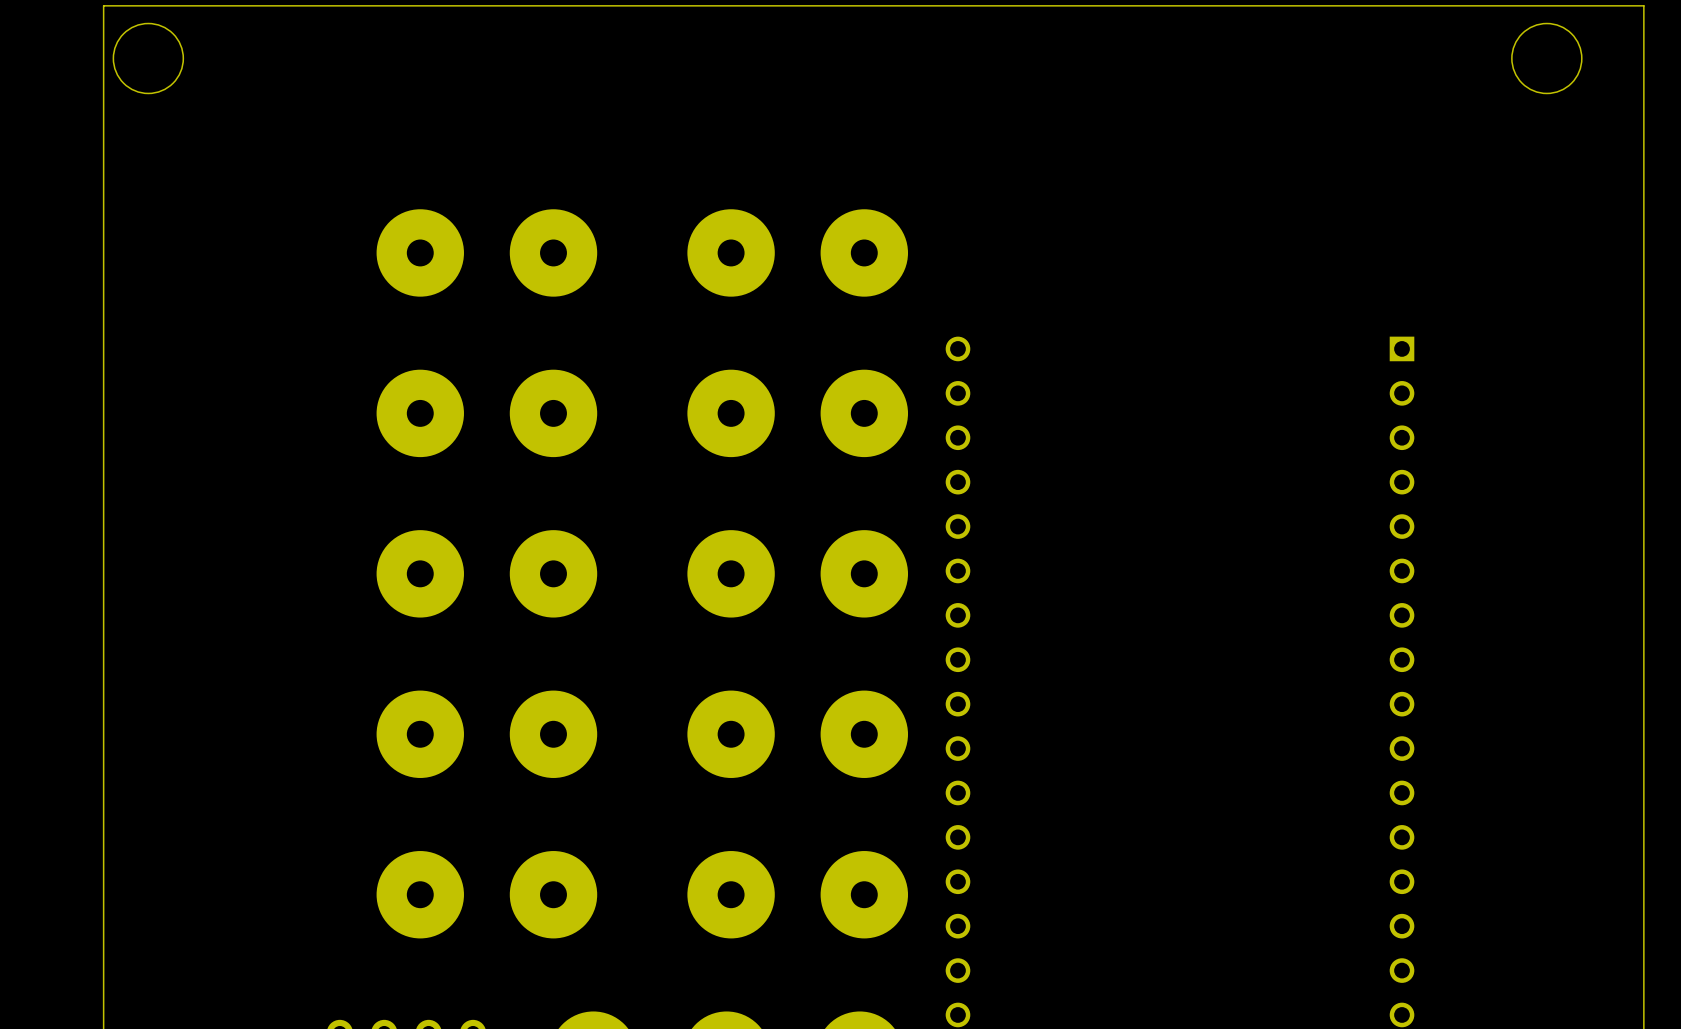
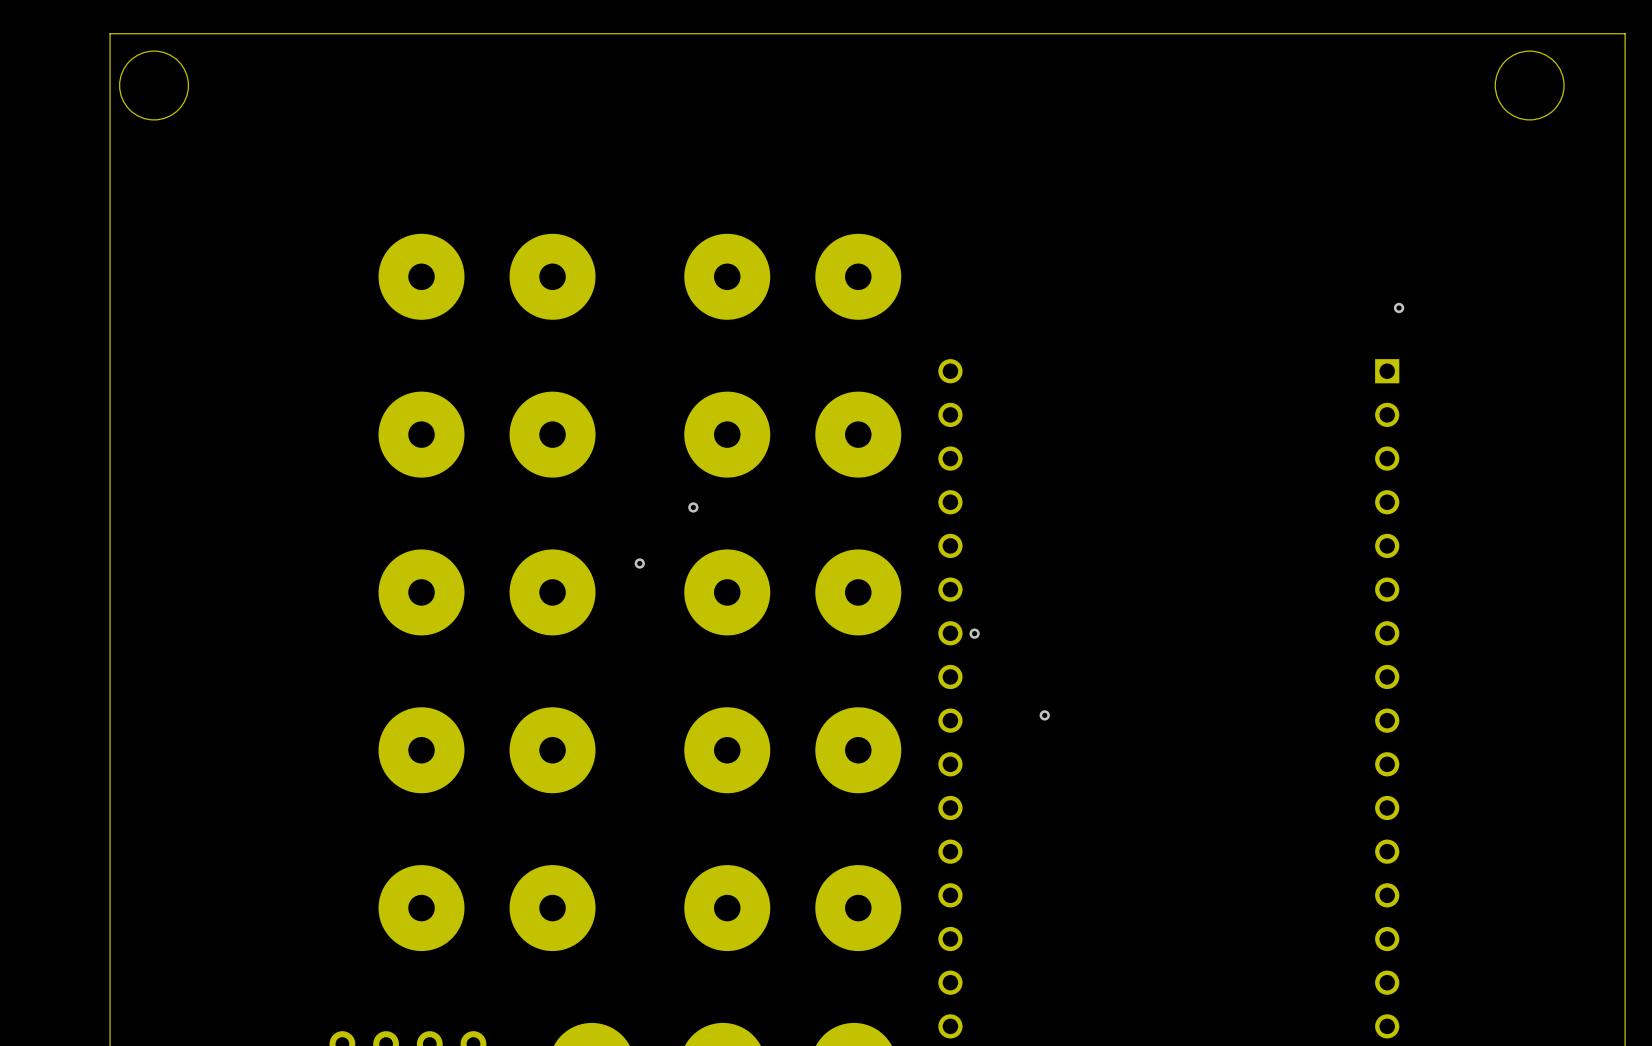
via: none -> (1399, 307)
via: none -> (693, 507)
via: none -> (639, 563)
via: none -> (974, 633)
via: none -> (1044, 715)

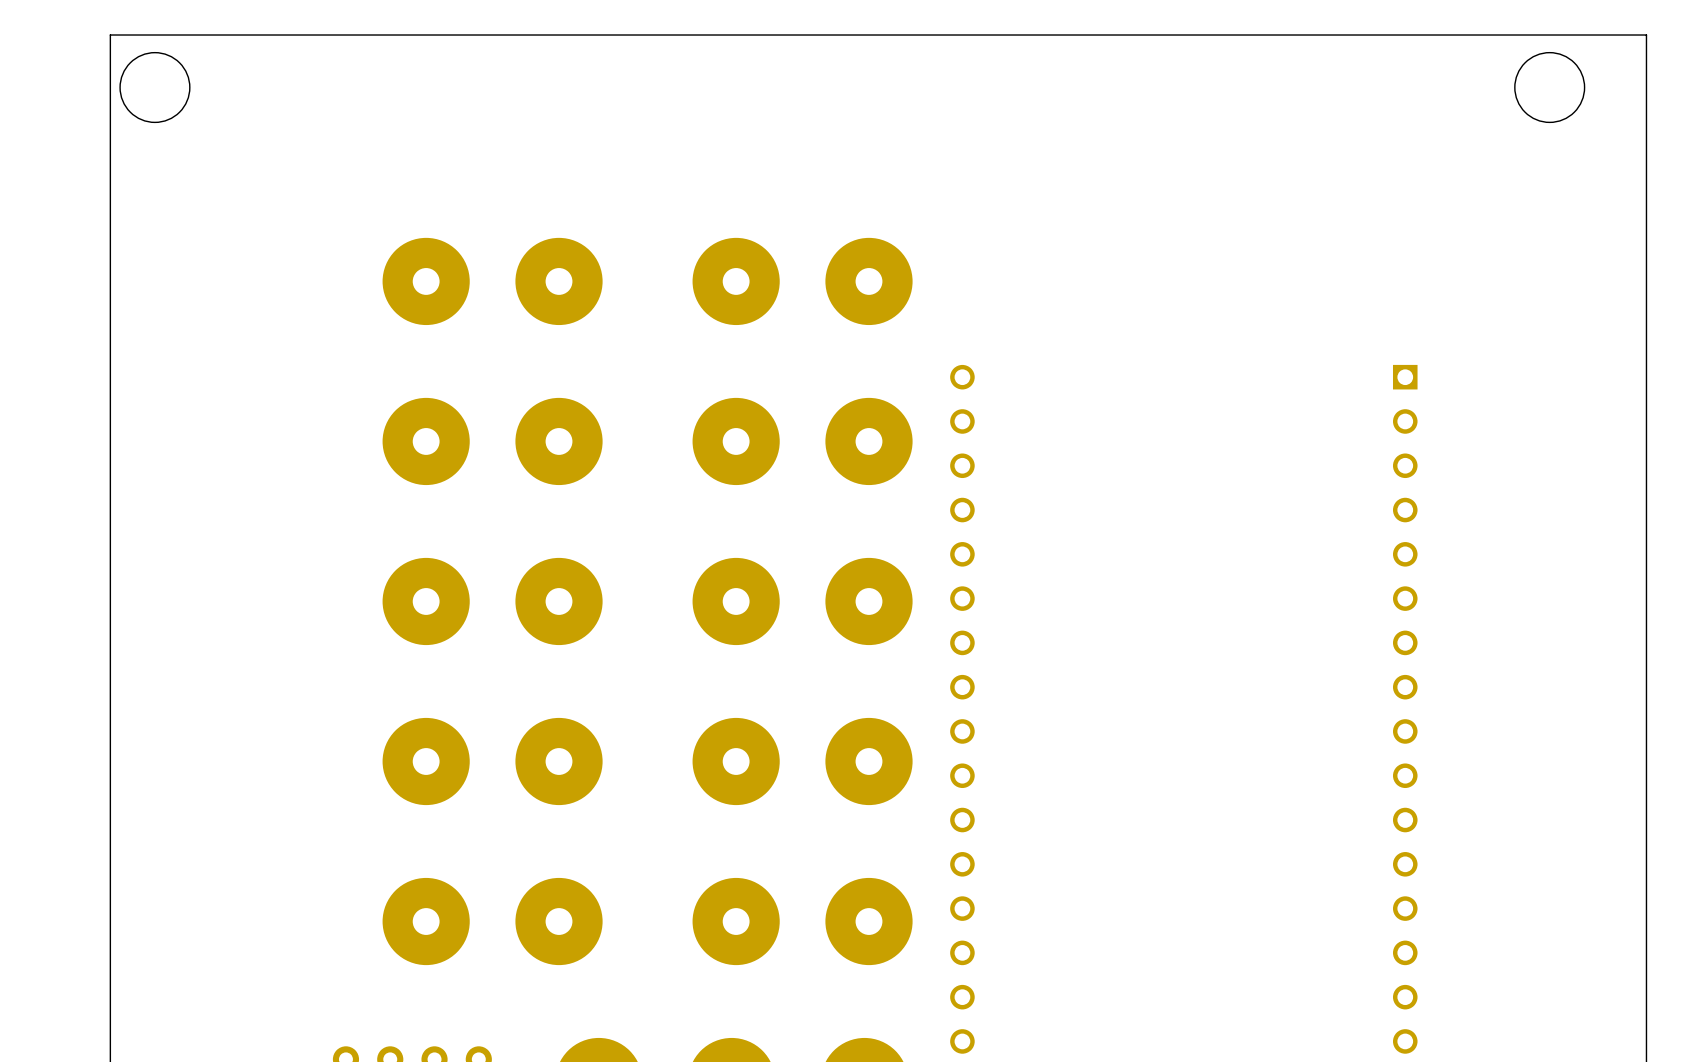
via: (1399, 307) -> none
via: (693, 507) -> none
via: (639, 563) -> none
via: (974, 633) -> none
via: (1044, 715) -> none

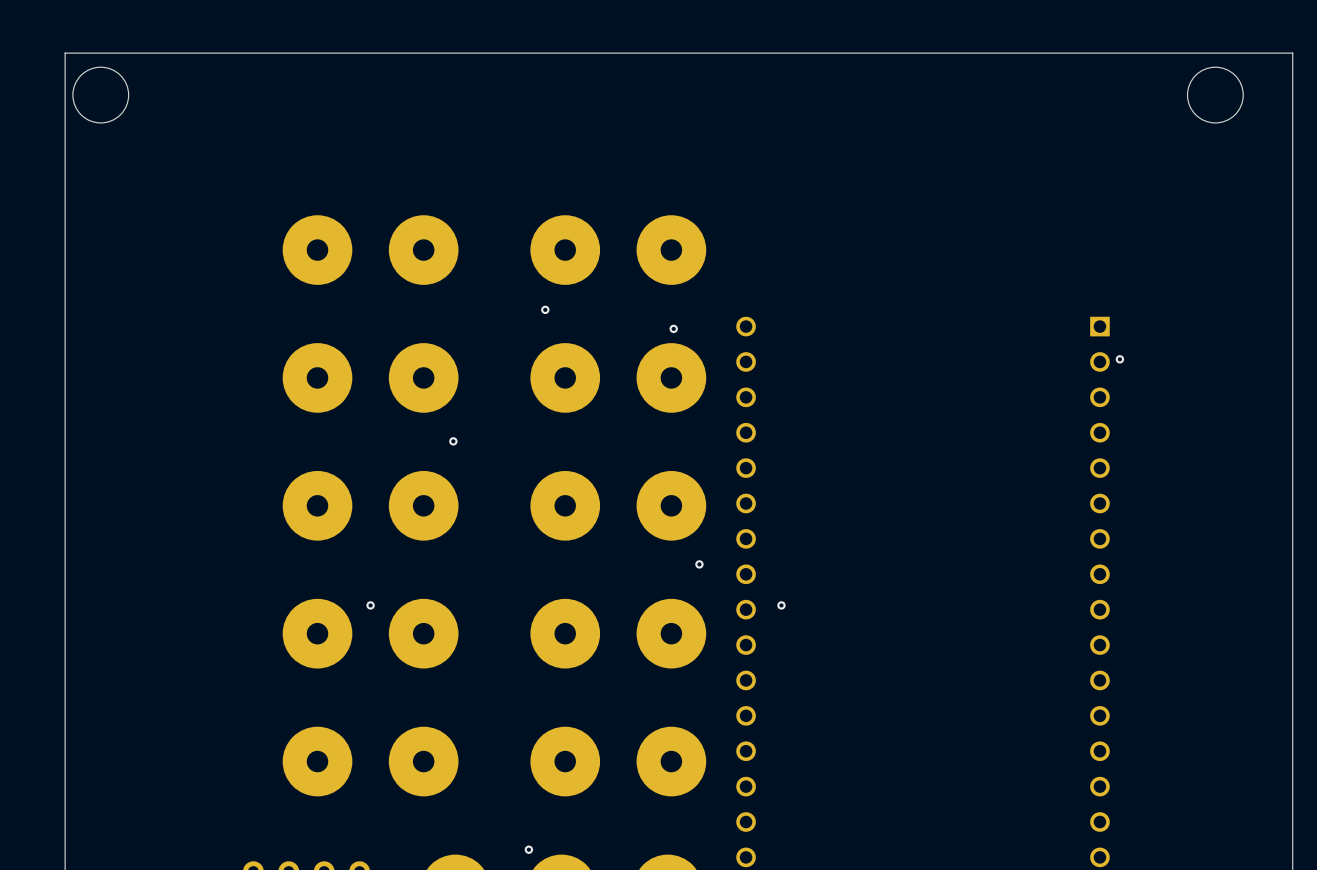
via: none -> (545, 309)
via: none -> (673, 328)
via: none -> (1119, 359)
via: none -> (453, 441)
via: none -> (699, 564)
via: none -> (370, 605)
via: none -> (781, 605)
via: none -> (528, 849)

